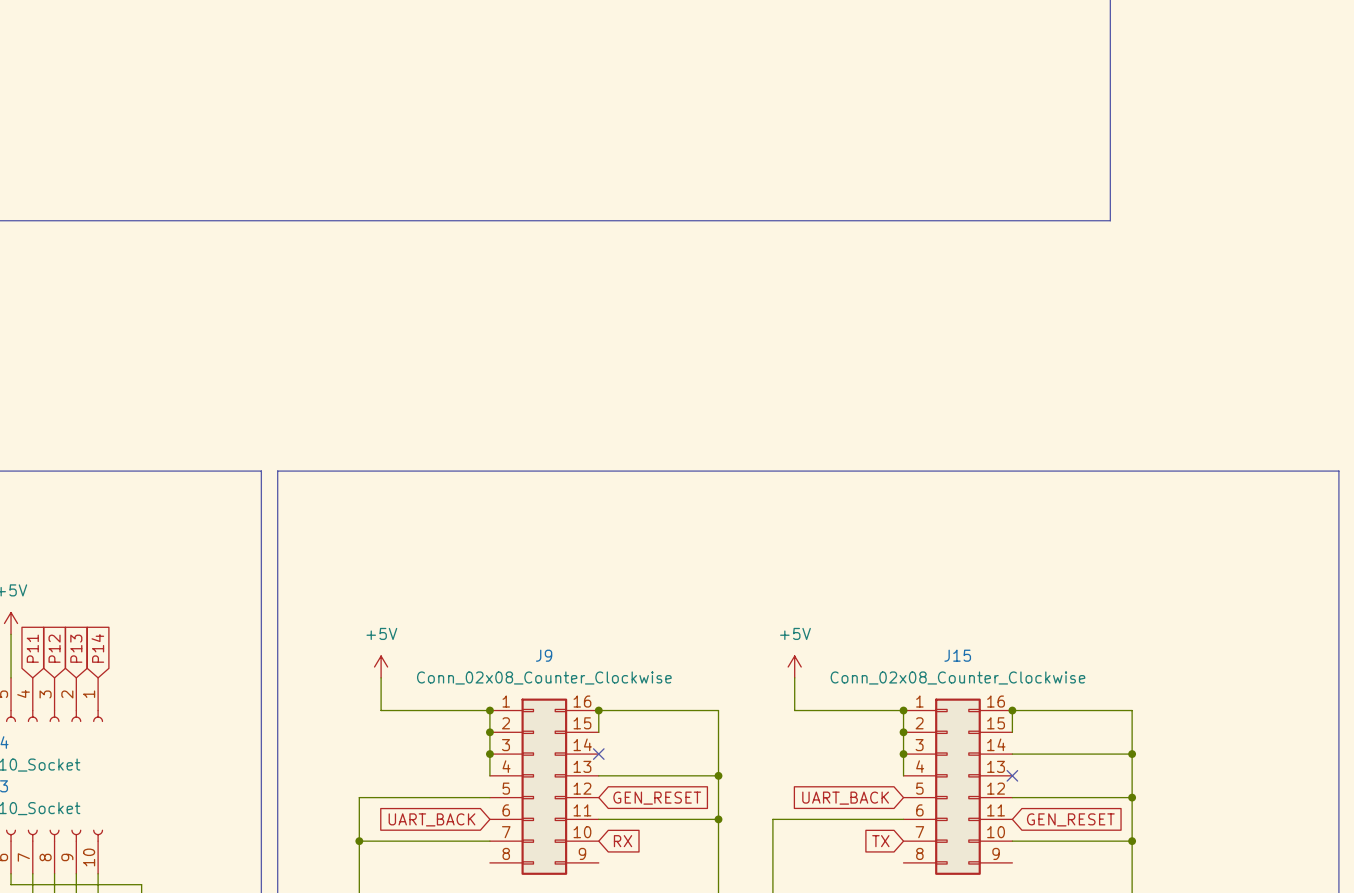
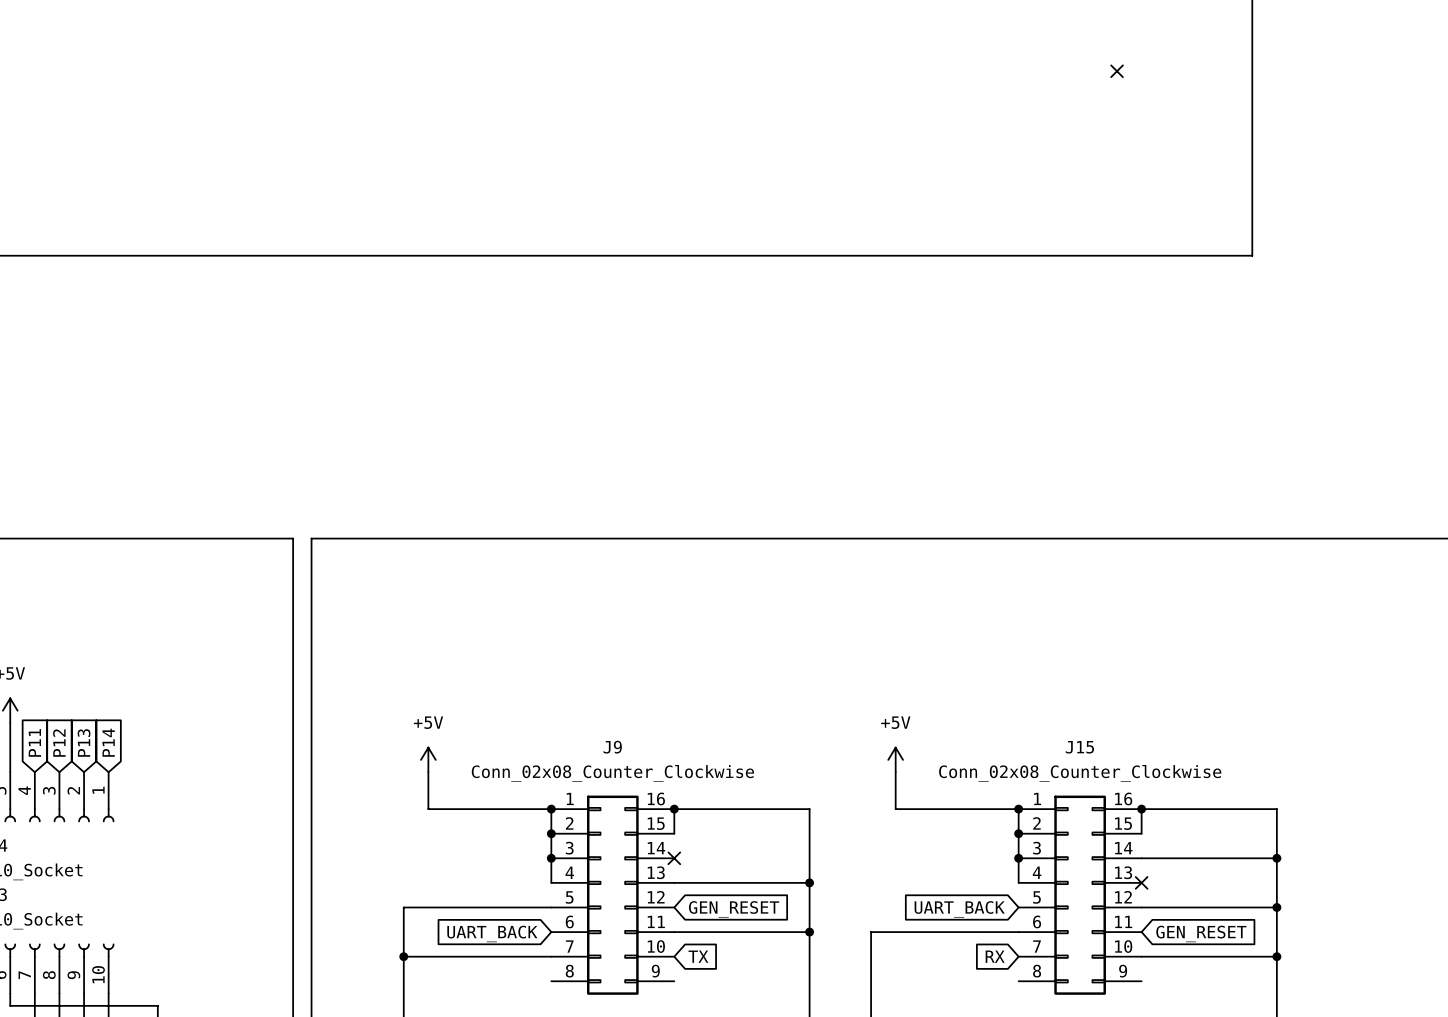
no-connect mark: none -> (1117, 71)
global label: RX (623, 841) -> TX (698, 956)
global label: TX (880, 841) -> RX (995, 956)

